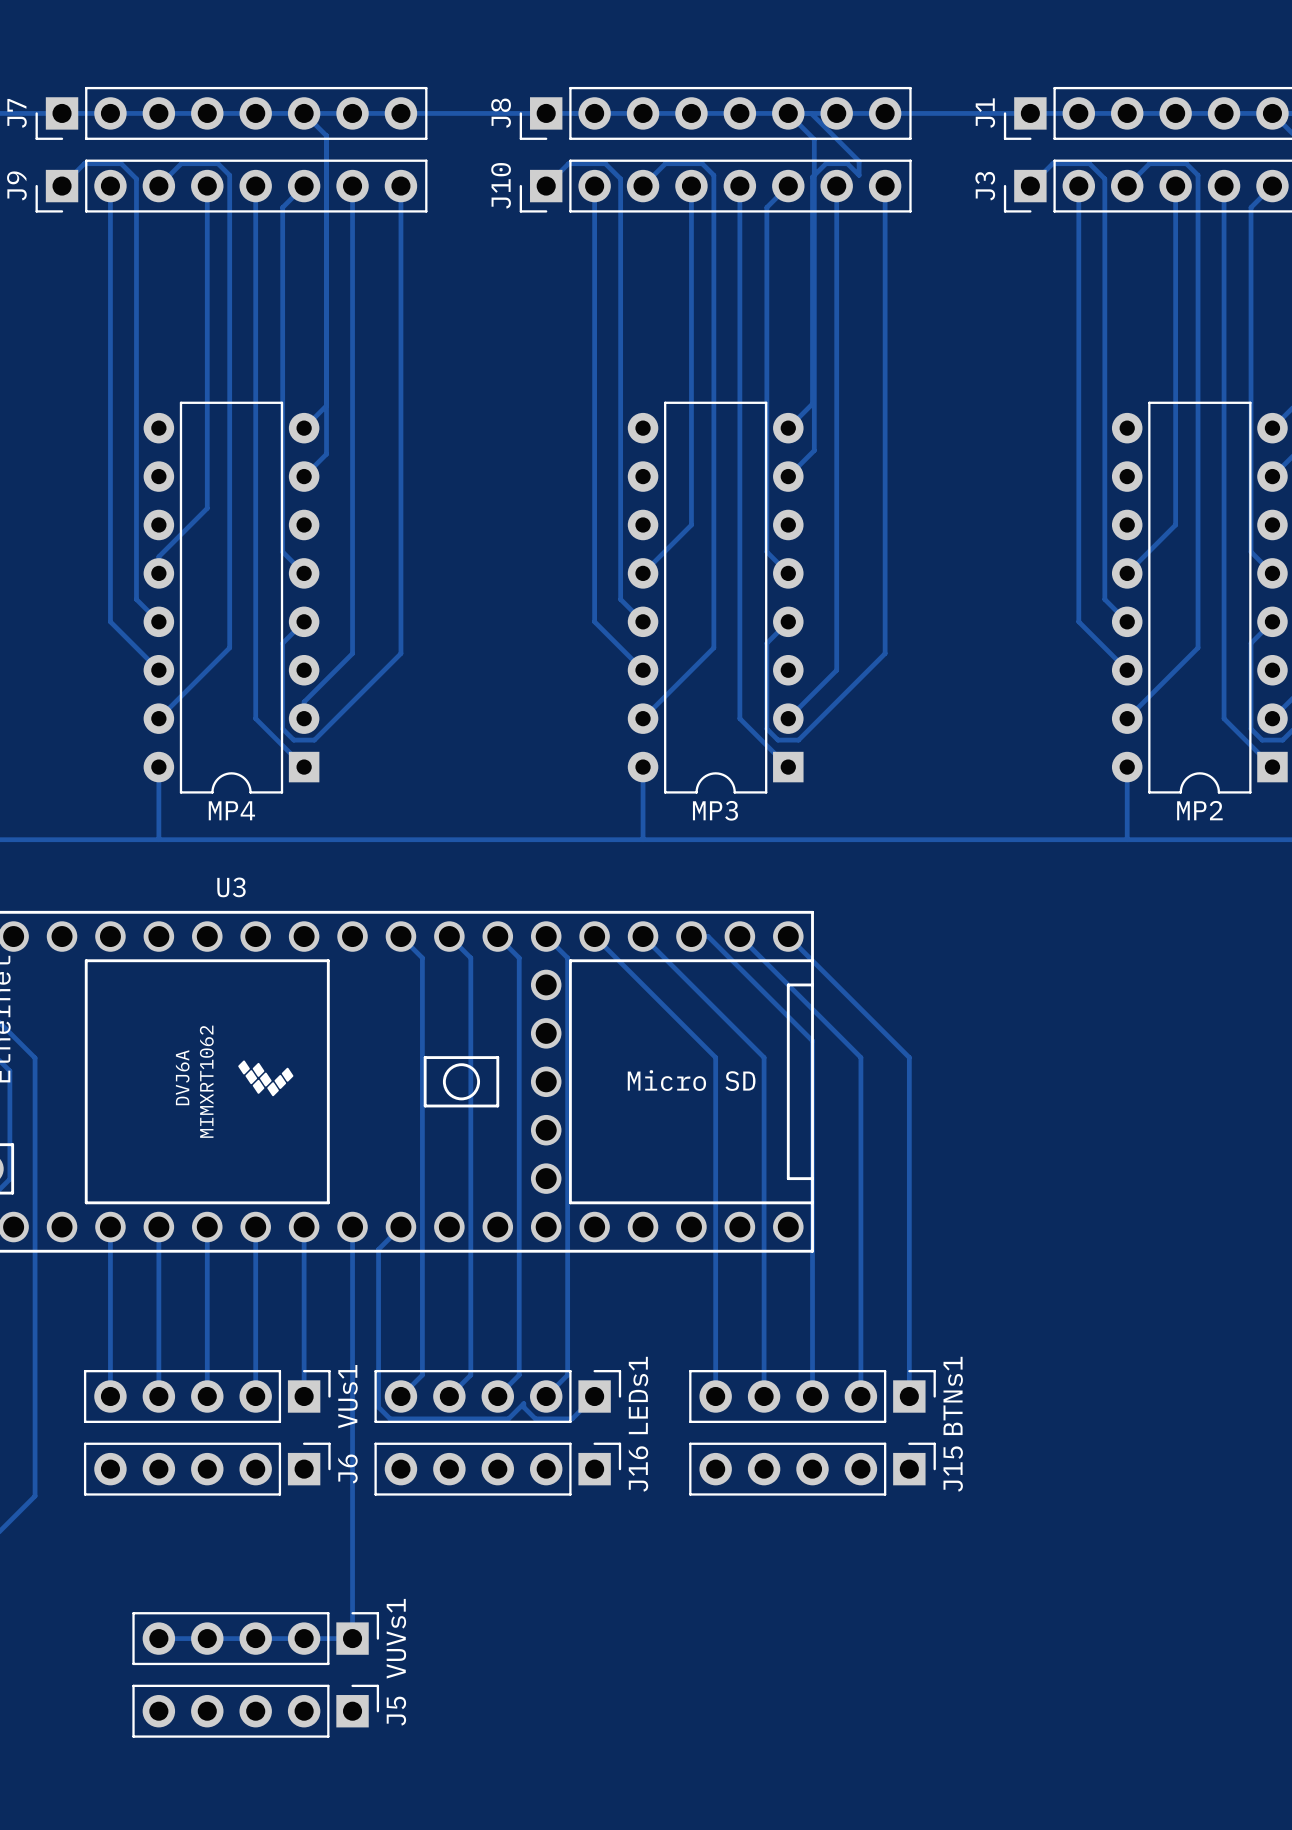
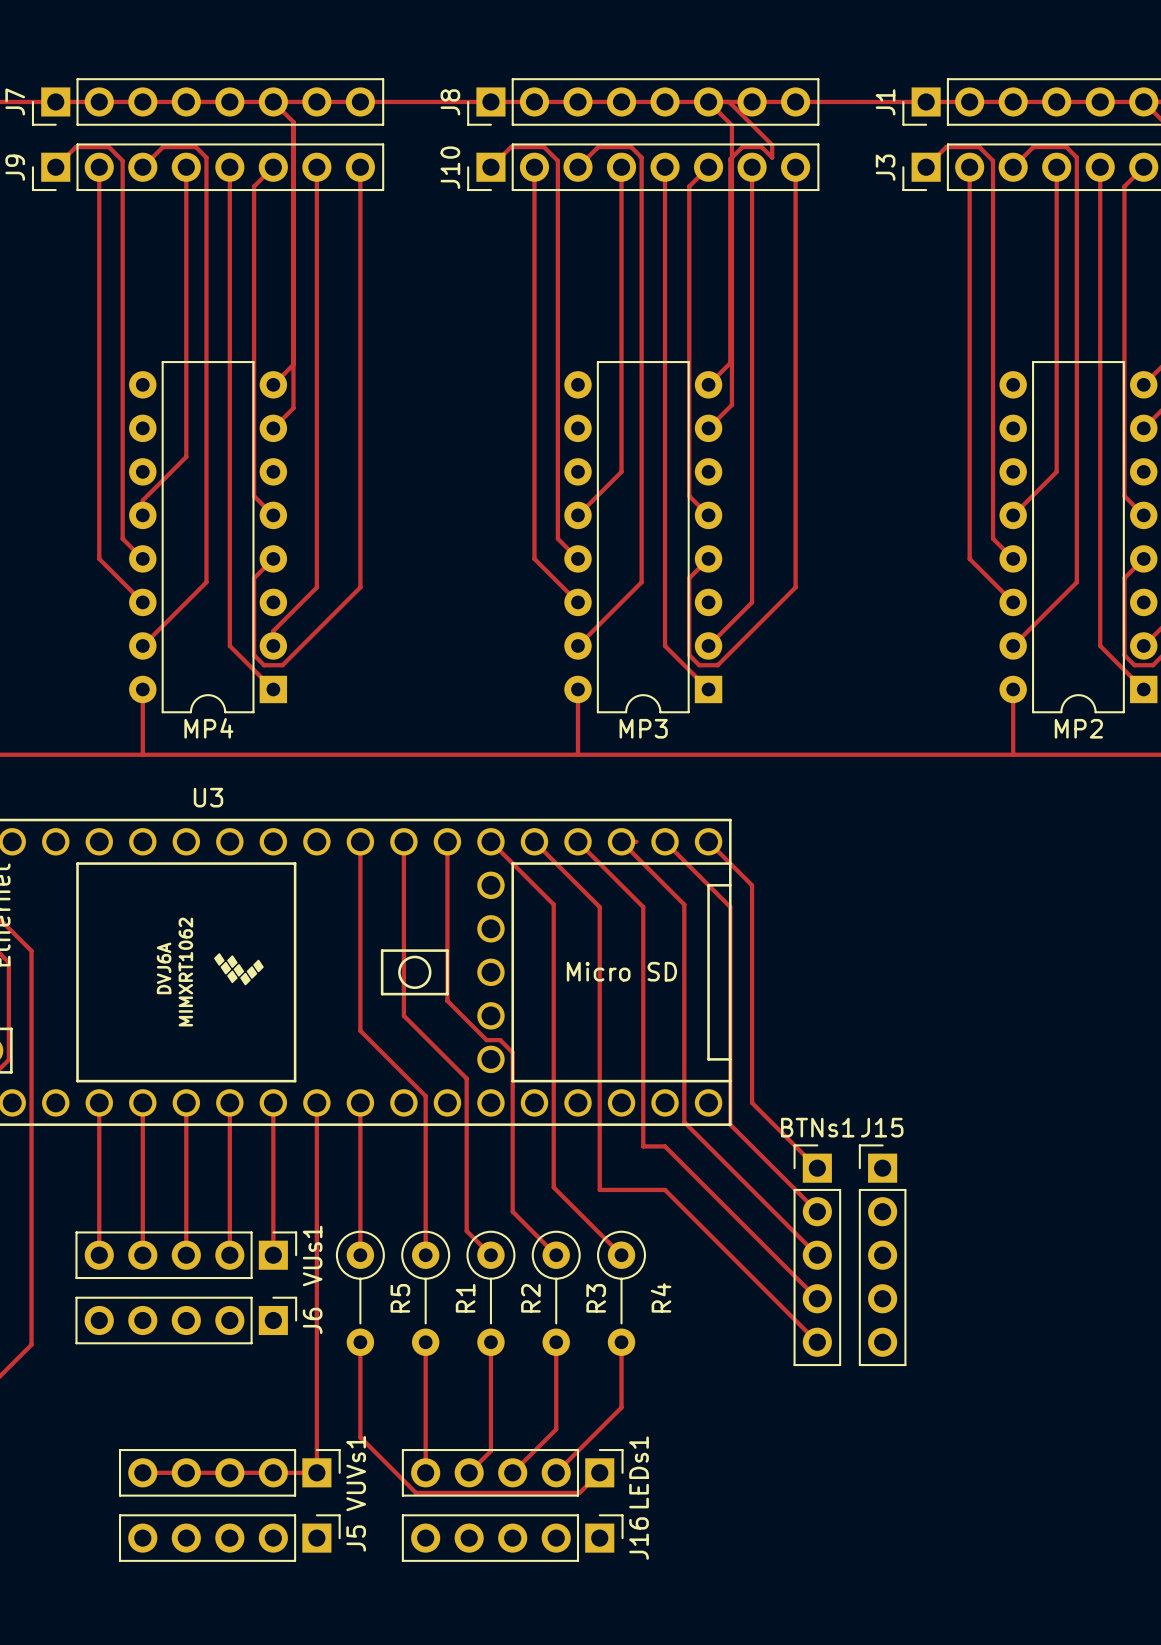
track: (400, 936) (422, 957) (422, 1375) (400, 1396) -> (360, 841) (360, 1030) (425, 1096) (425, 1255)
track: (449, 936) (470, 957) (470, 1375) (449, 1396) -> none
track: (497, 936) (519, 957) (519, 1200) -> (403, 841) (403, 1015) (466, 1078)
track: none -> (447, 841) (447, 1000) (486, 1040) (500, 1040) (512, 1052) (512, 1211) (556, 1255)
track: none -> (621, 841) (684, 904) (684, 1122) (817, 1255)
track: (708, 936) (812, 1040) -> (730, 907) (730, 935)
track: (567, 957) (567, 1375) (546, 1396) -> (510, 861) (553, 904) (553, 1187) (621, 1255)
track: (836, 984) (909, 1057) (909, 1396) -> (752, 885) (752, 1102) (817, 1168)
track: (667, 1009) (715, 1057) -> (643, 907) (643, 950)
track: none -> (599, 907) (599, 1189) (665, 1189) (817, 1342)
track: (715, 1009) (764, 1057) (764, 1396) -> none
track: (812, 1009) (860, 1057) (860, 1396) -> none
track: (400, 1227) (378, 1249) (378, 1407) (390, 1418) (508, 1418) (523, 1403) (523, 1407) (535, 1418) (572, 1418) (594, 1396) -> (360, 1102) (360, 1255)
track: (812, 1251) (812, 1396) -> (730, 1124) (817, 1211)
track: (715, 1275) (715, 1396) -> (643, 1146) (665, 1146) (817, 1298)
track: (519, 1369) (519, 1375) (497, 1396) -> (466, 1230) (490, 1255)
LEDs1 position: (497, 1396) -> (512, 1472)
BTNs1 rotation: 0° (812, 1396) -> 90° counterclockwise (817, 1255)
R5: none -> (360, 1293)
R1: none -> (425, 1293)
R2: none -> (490, 1293)
R3: none -> (556, 1293)
R4: none -> (621, 1293)
J16 position: (497, 1469) -> (512, 1538)
J15 rotation: 0° (812, 1469) -> 90° counterclockwise (882, 1255)
J15 position: (812, 1469) -> (882, 1255)
track: none -> (360, 1342) (360, 1437) (416, 1492) (579, 1492) (599, 1472)
track: none -> (425, 1342) (425, 1472)
track: none -> (490, 1342) (490, 1451) (469, 1472)
track: none -> (556, 1342) (556, 1429) (512, 1472)
track: none -> (621, 1342) (621, 1407) (556, 1472)

